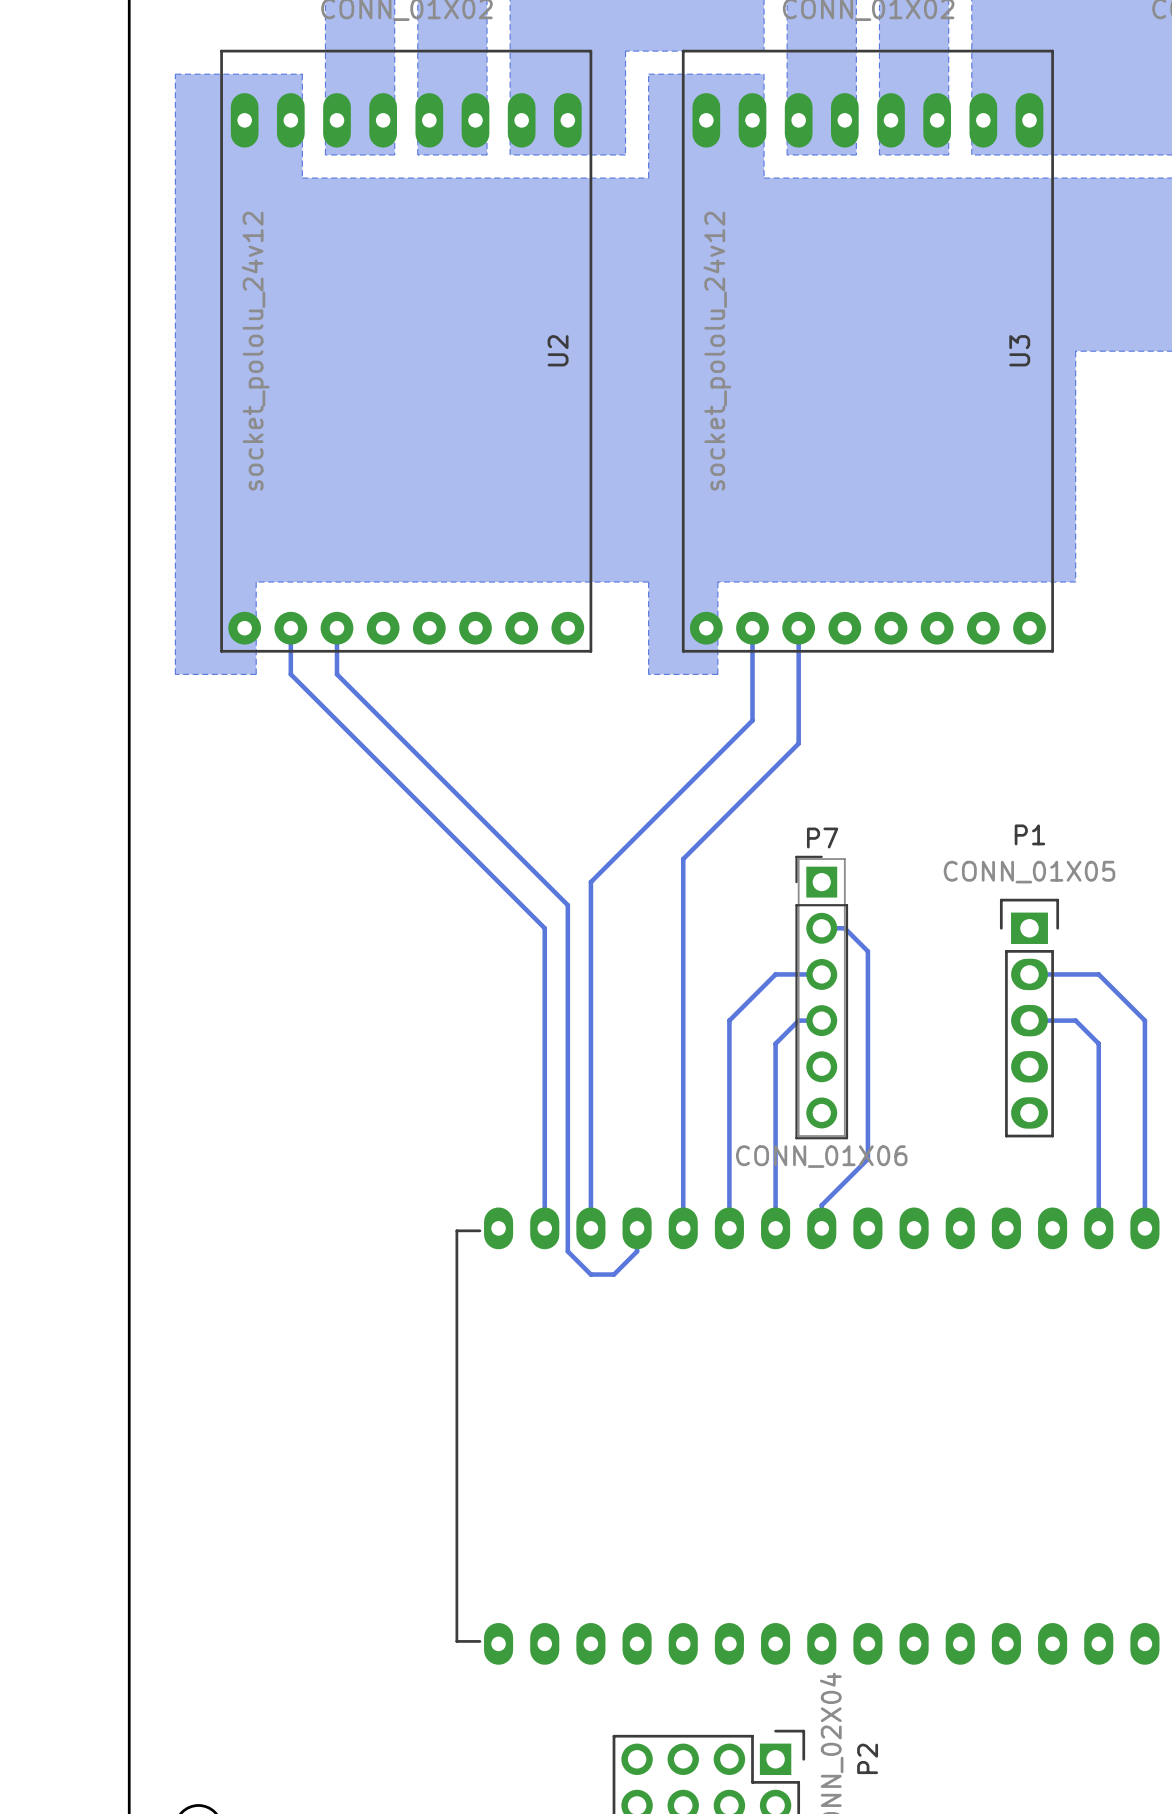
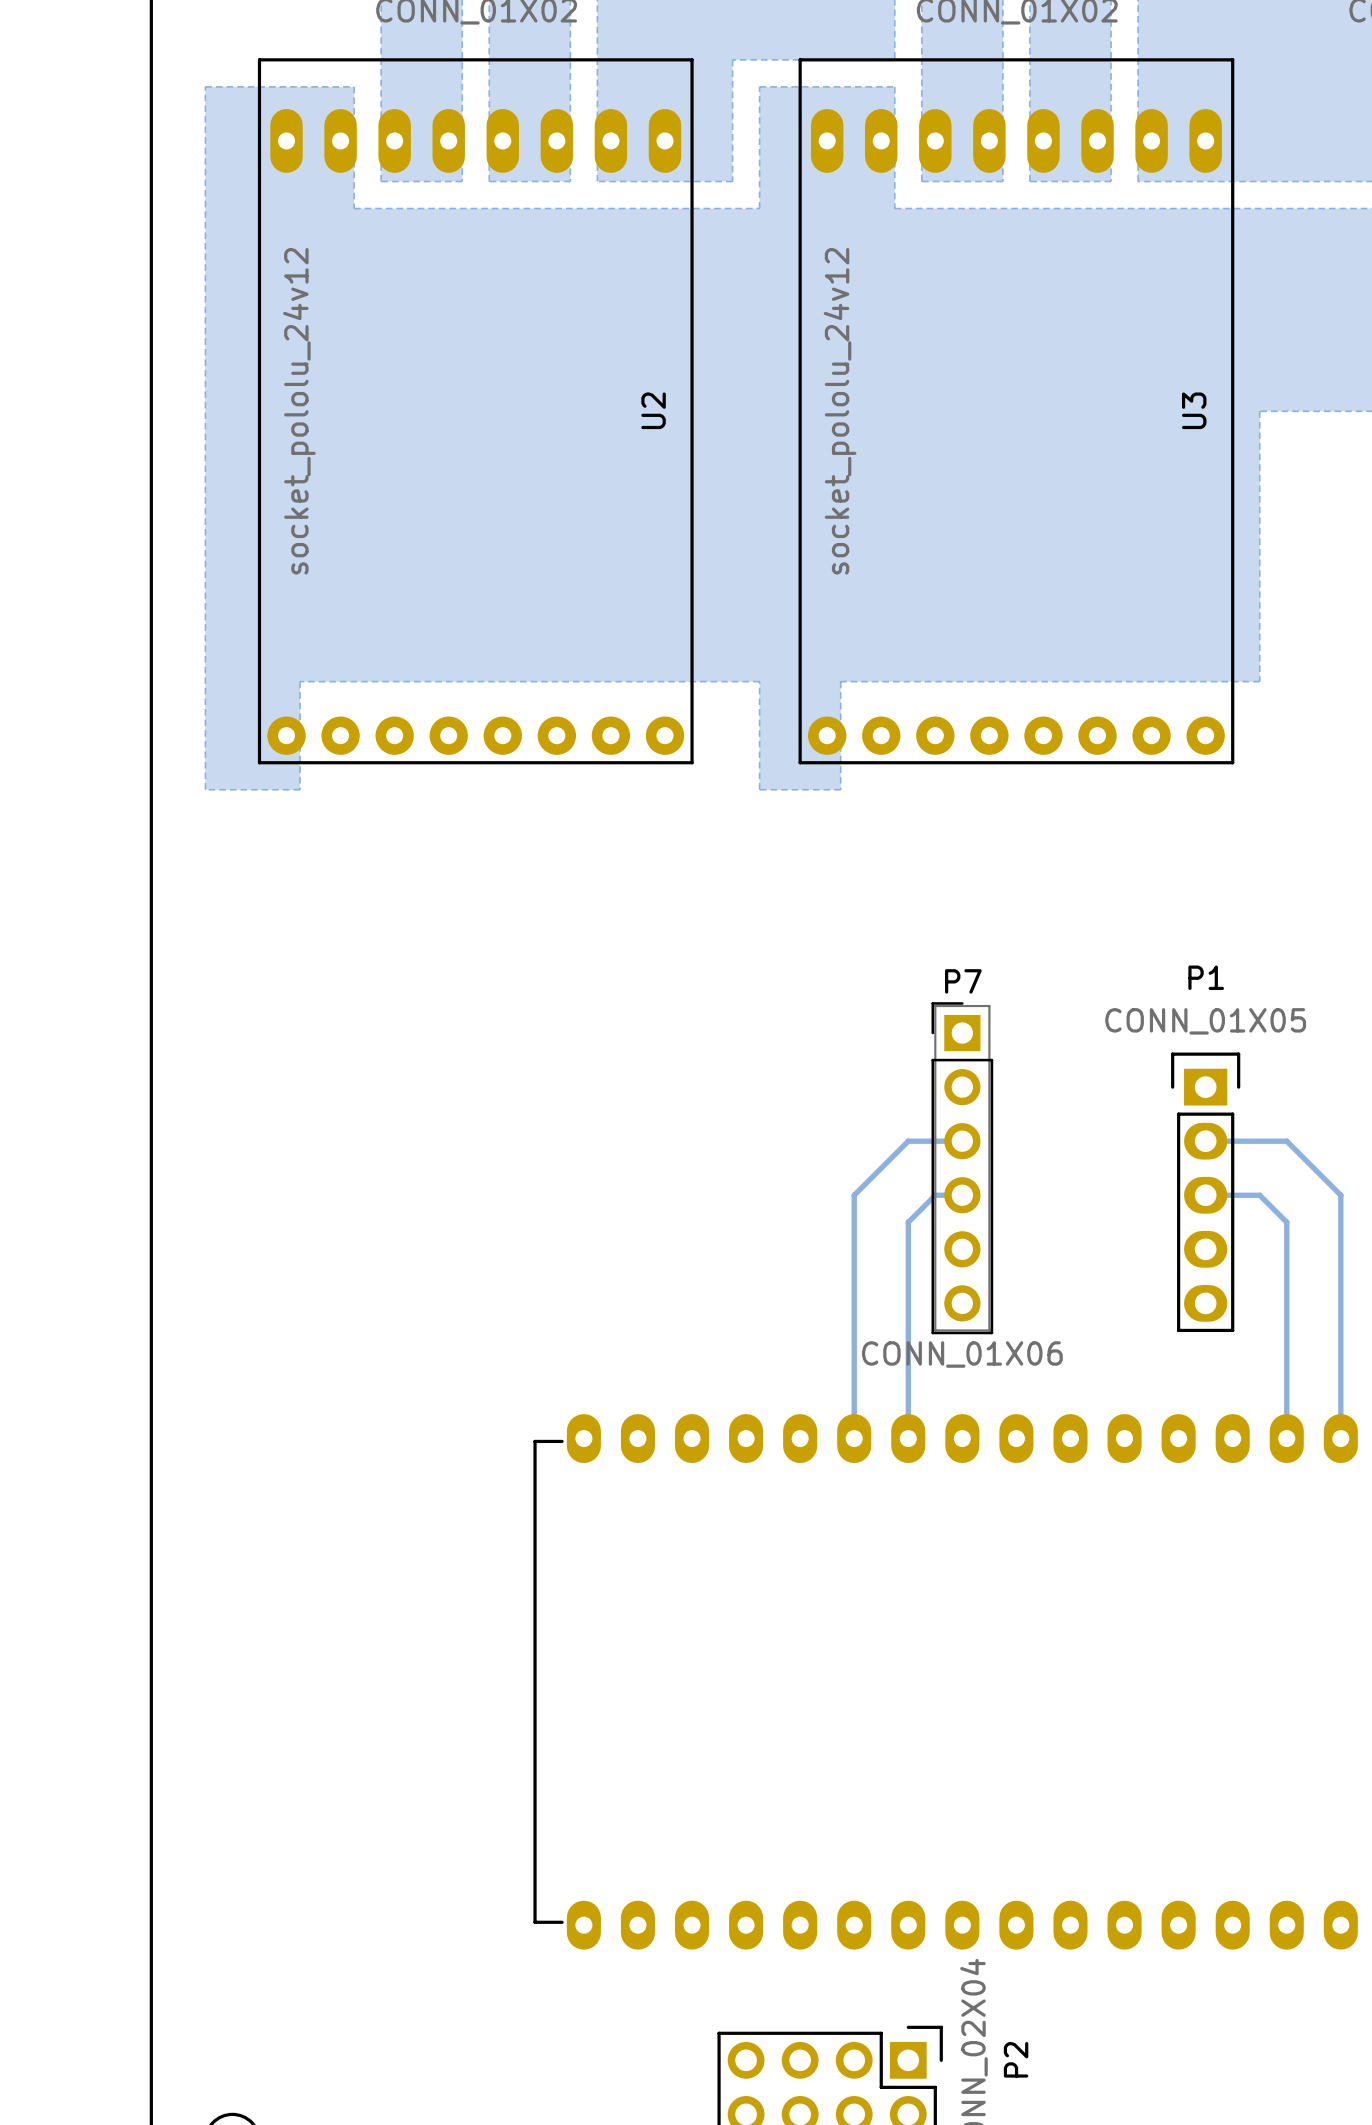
bottom track: (290, 628) (290, 674) (544, 928) (544, 1228) -> none
bottom track: (336, 628) (336, 674) (567, 905) (567, 1251) (590, 1274) (613, 1274) (637, 1251) (637, 1228) -> none
bottom track: (752, 628) (752, 720) (590, 882) (590, 1228) -> none
bottom track: (798, 628) (798, 743) (683, 859) (683, 1228) -> none
bottom track: (821, 928) (844, 928) (867, 951) (867, 1159) (821, 1205) (821, 1228) -> none

